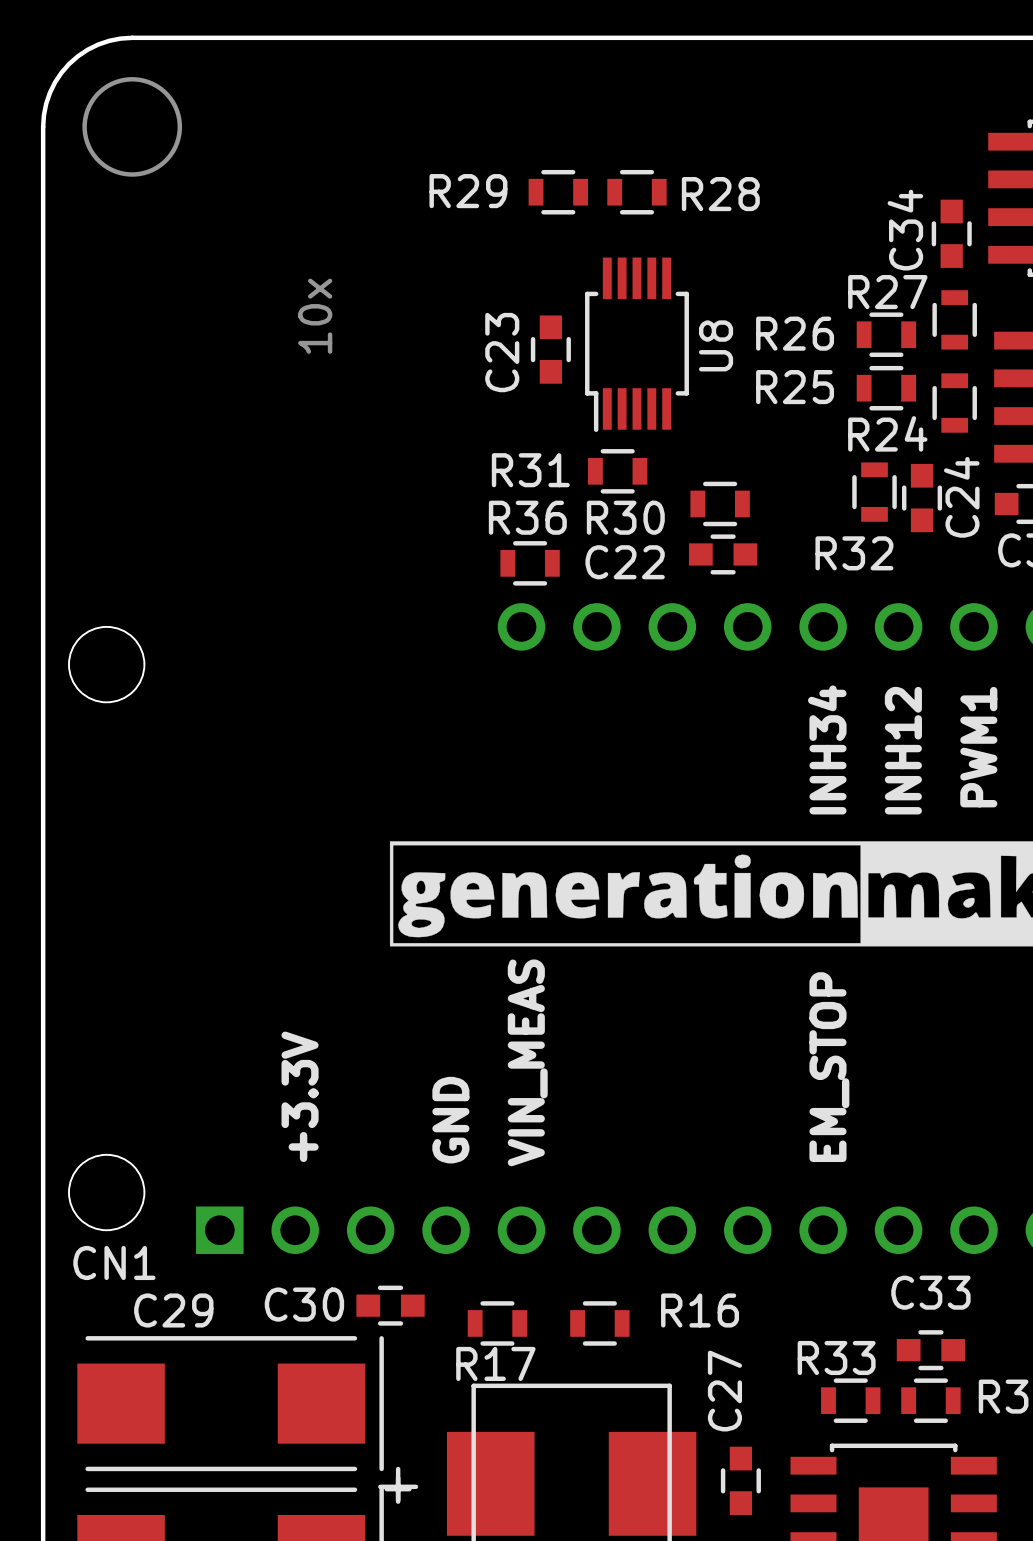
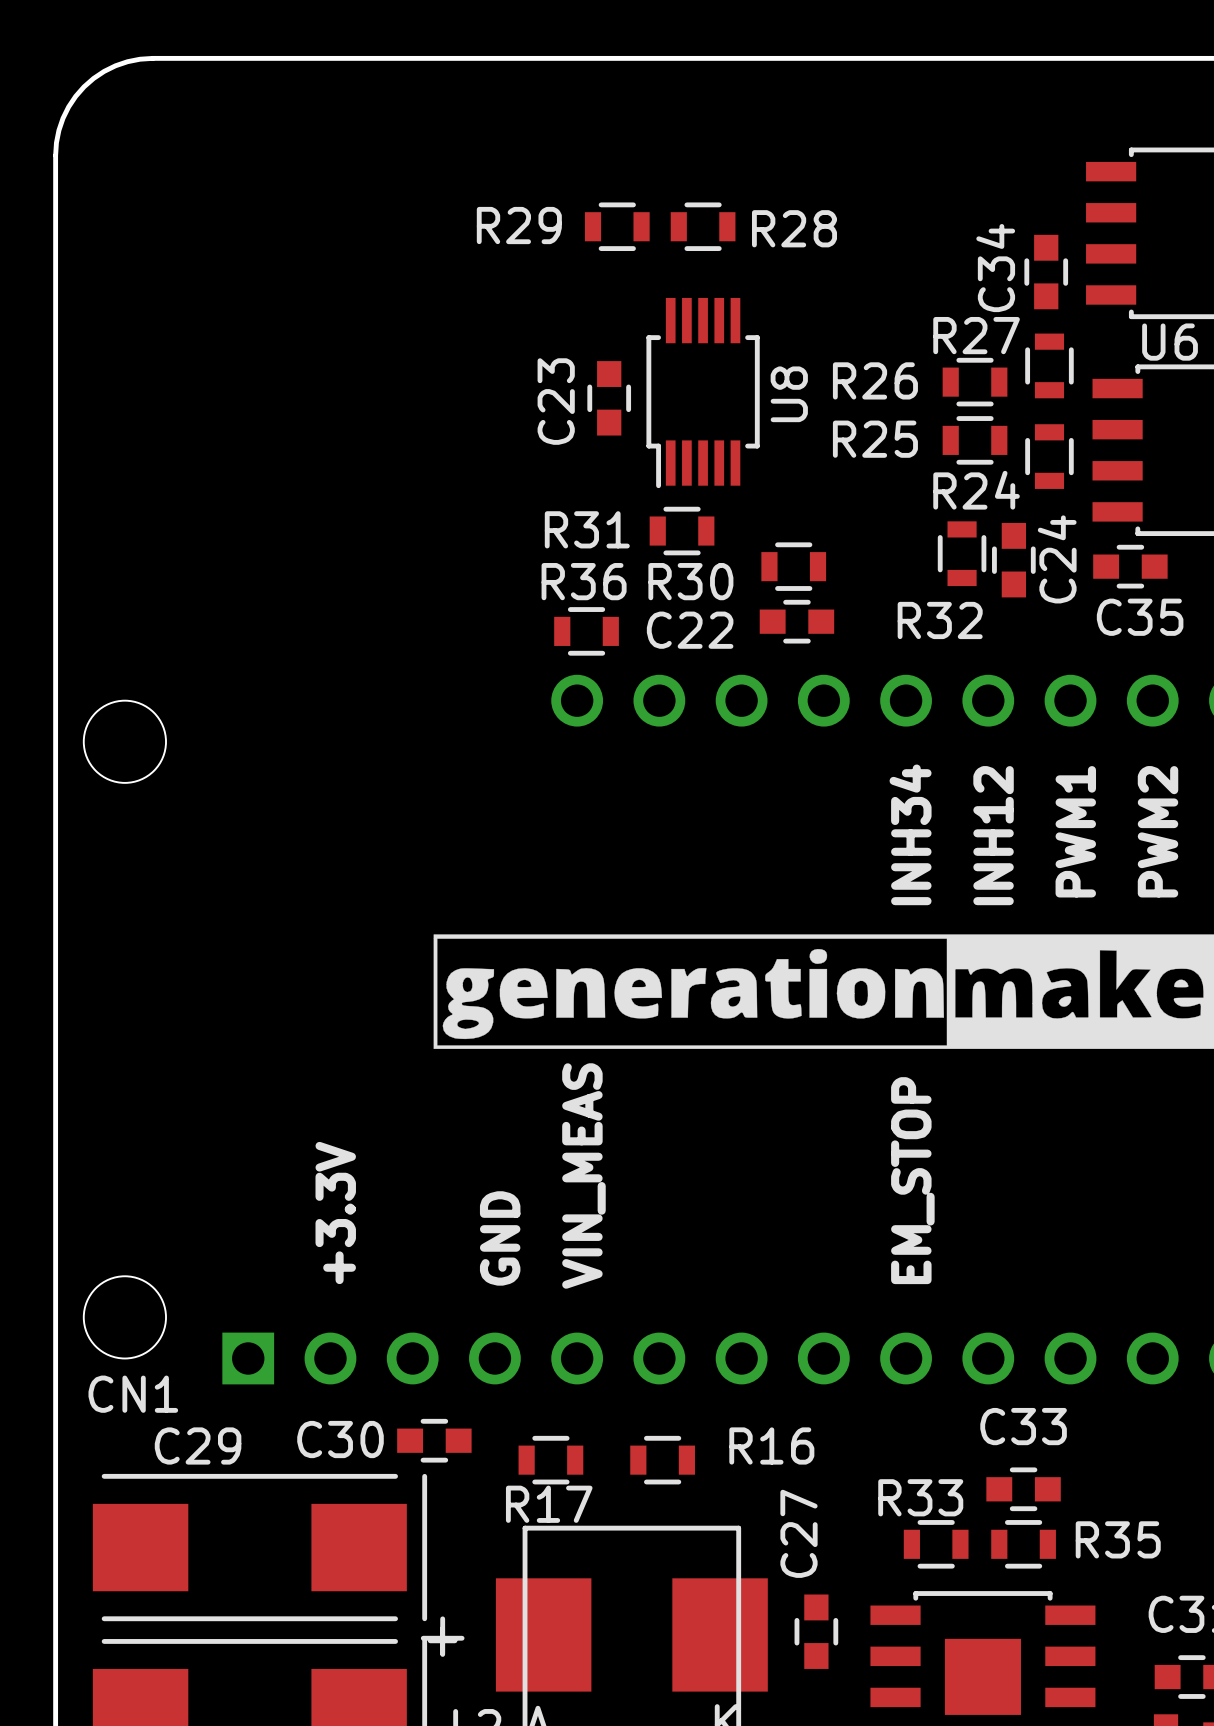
drawing: [82, 77, 183, 177] -> none
text: 10x (315, 316) -> none

